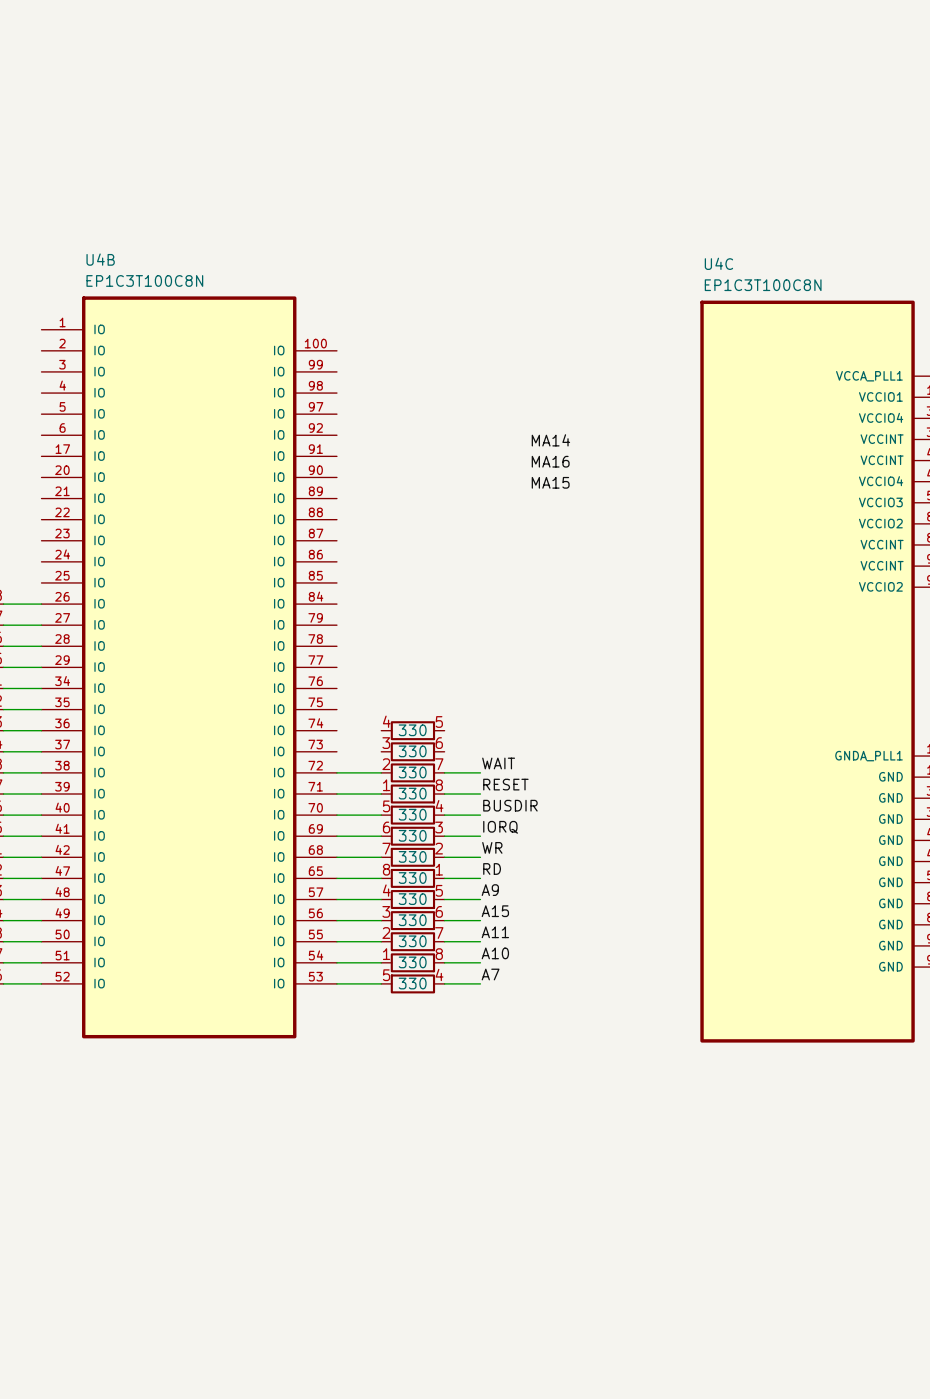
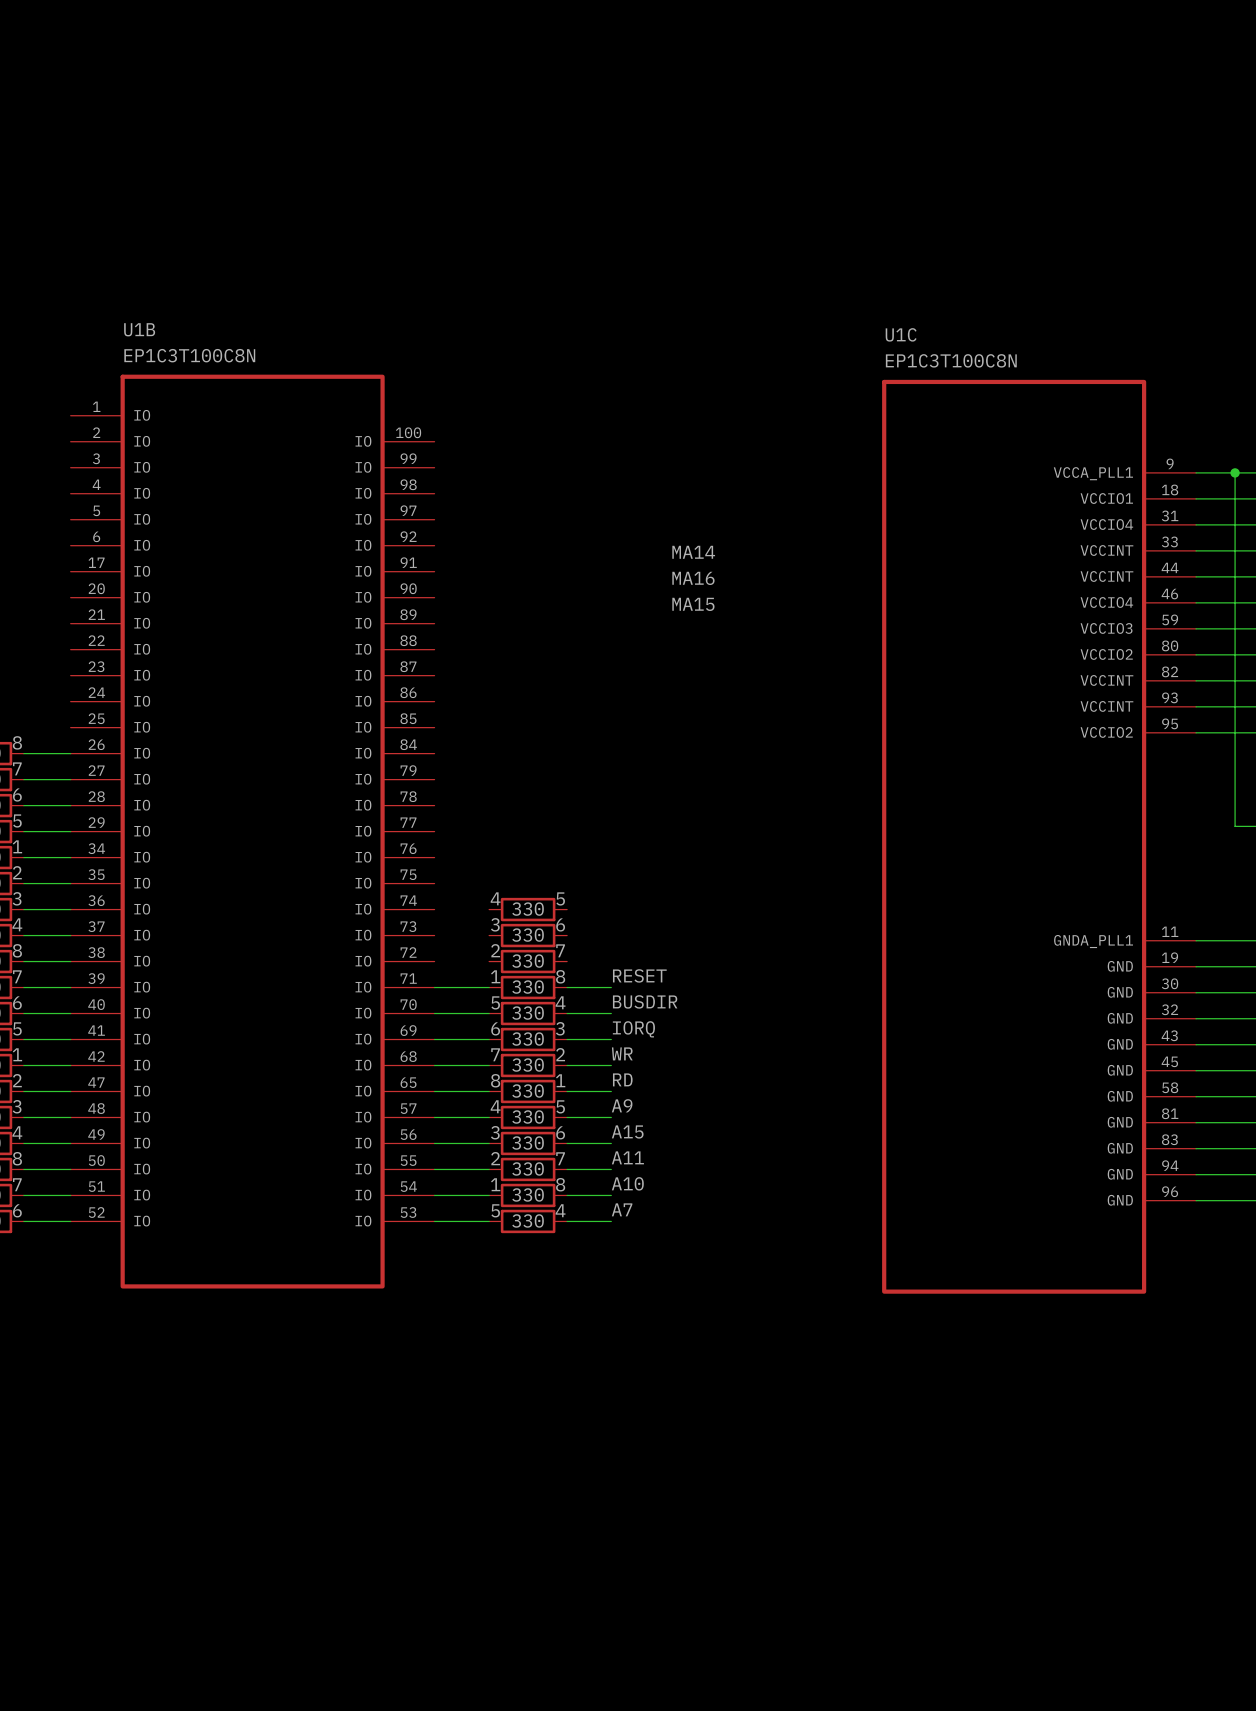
U4B name: U4B (100, 259) -> U1B (139, 329)
U4C name: U4C (718, 263) -> U1C (901, 334)
label: WAIT (498, 763) -> none
wire: (336, 772) (381, 772) -> none
wire: (444, 772) (480, 772) -> none

